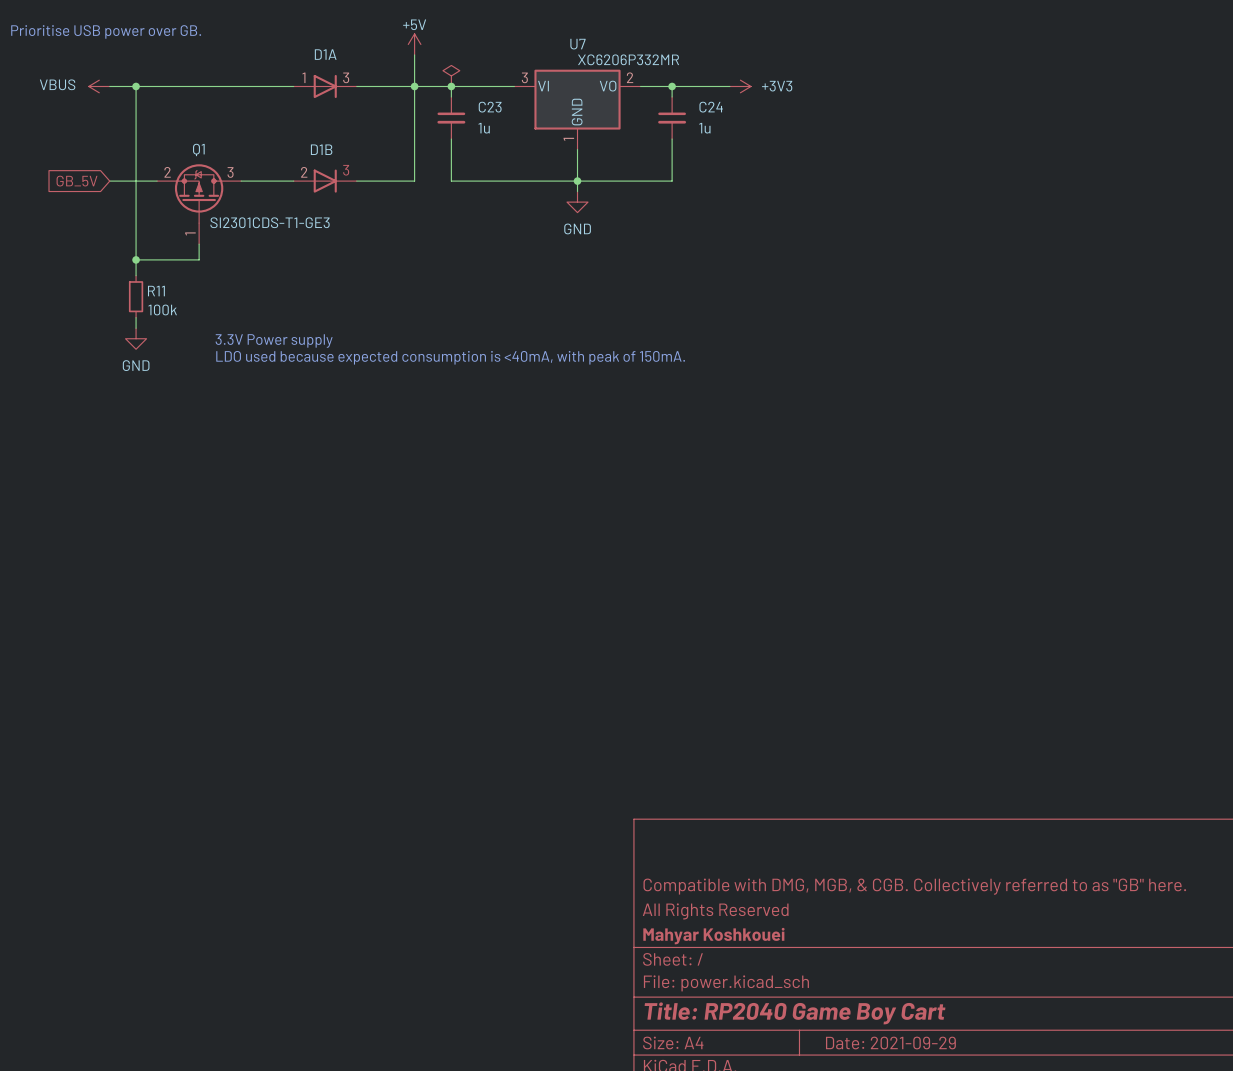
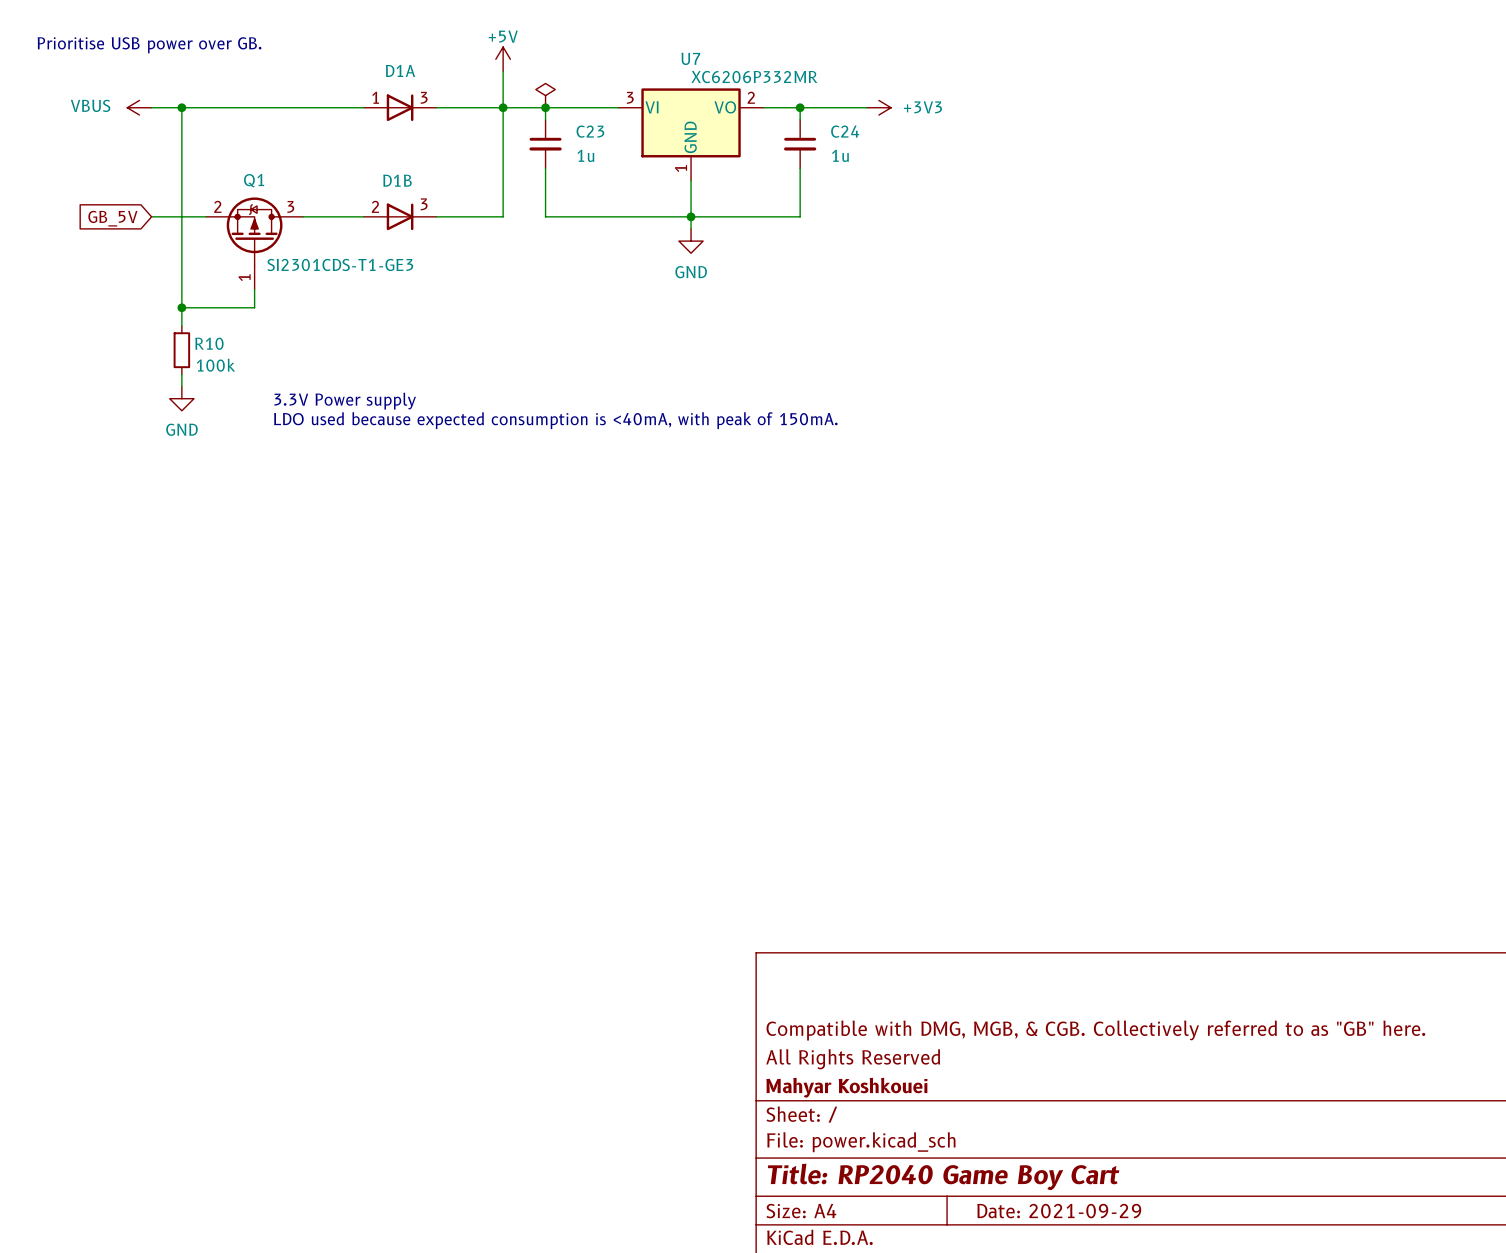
R11 name: R11 (156, 291) -> R10 (209, 343)

